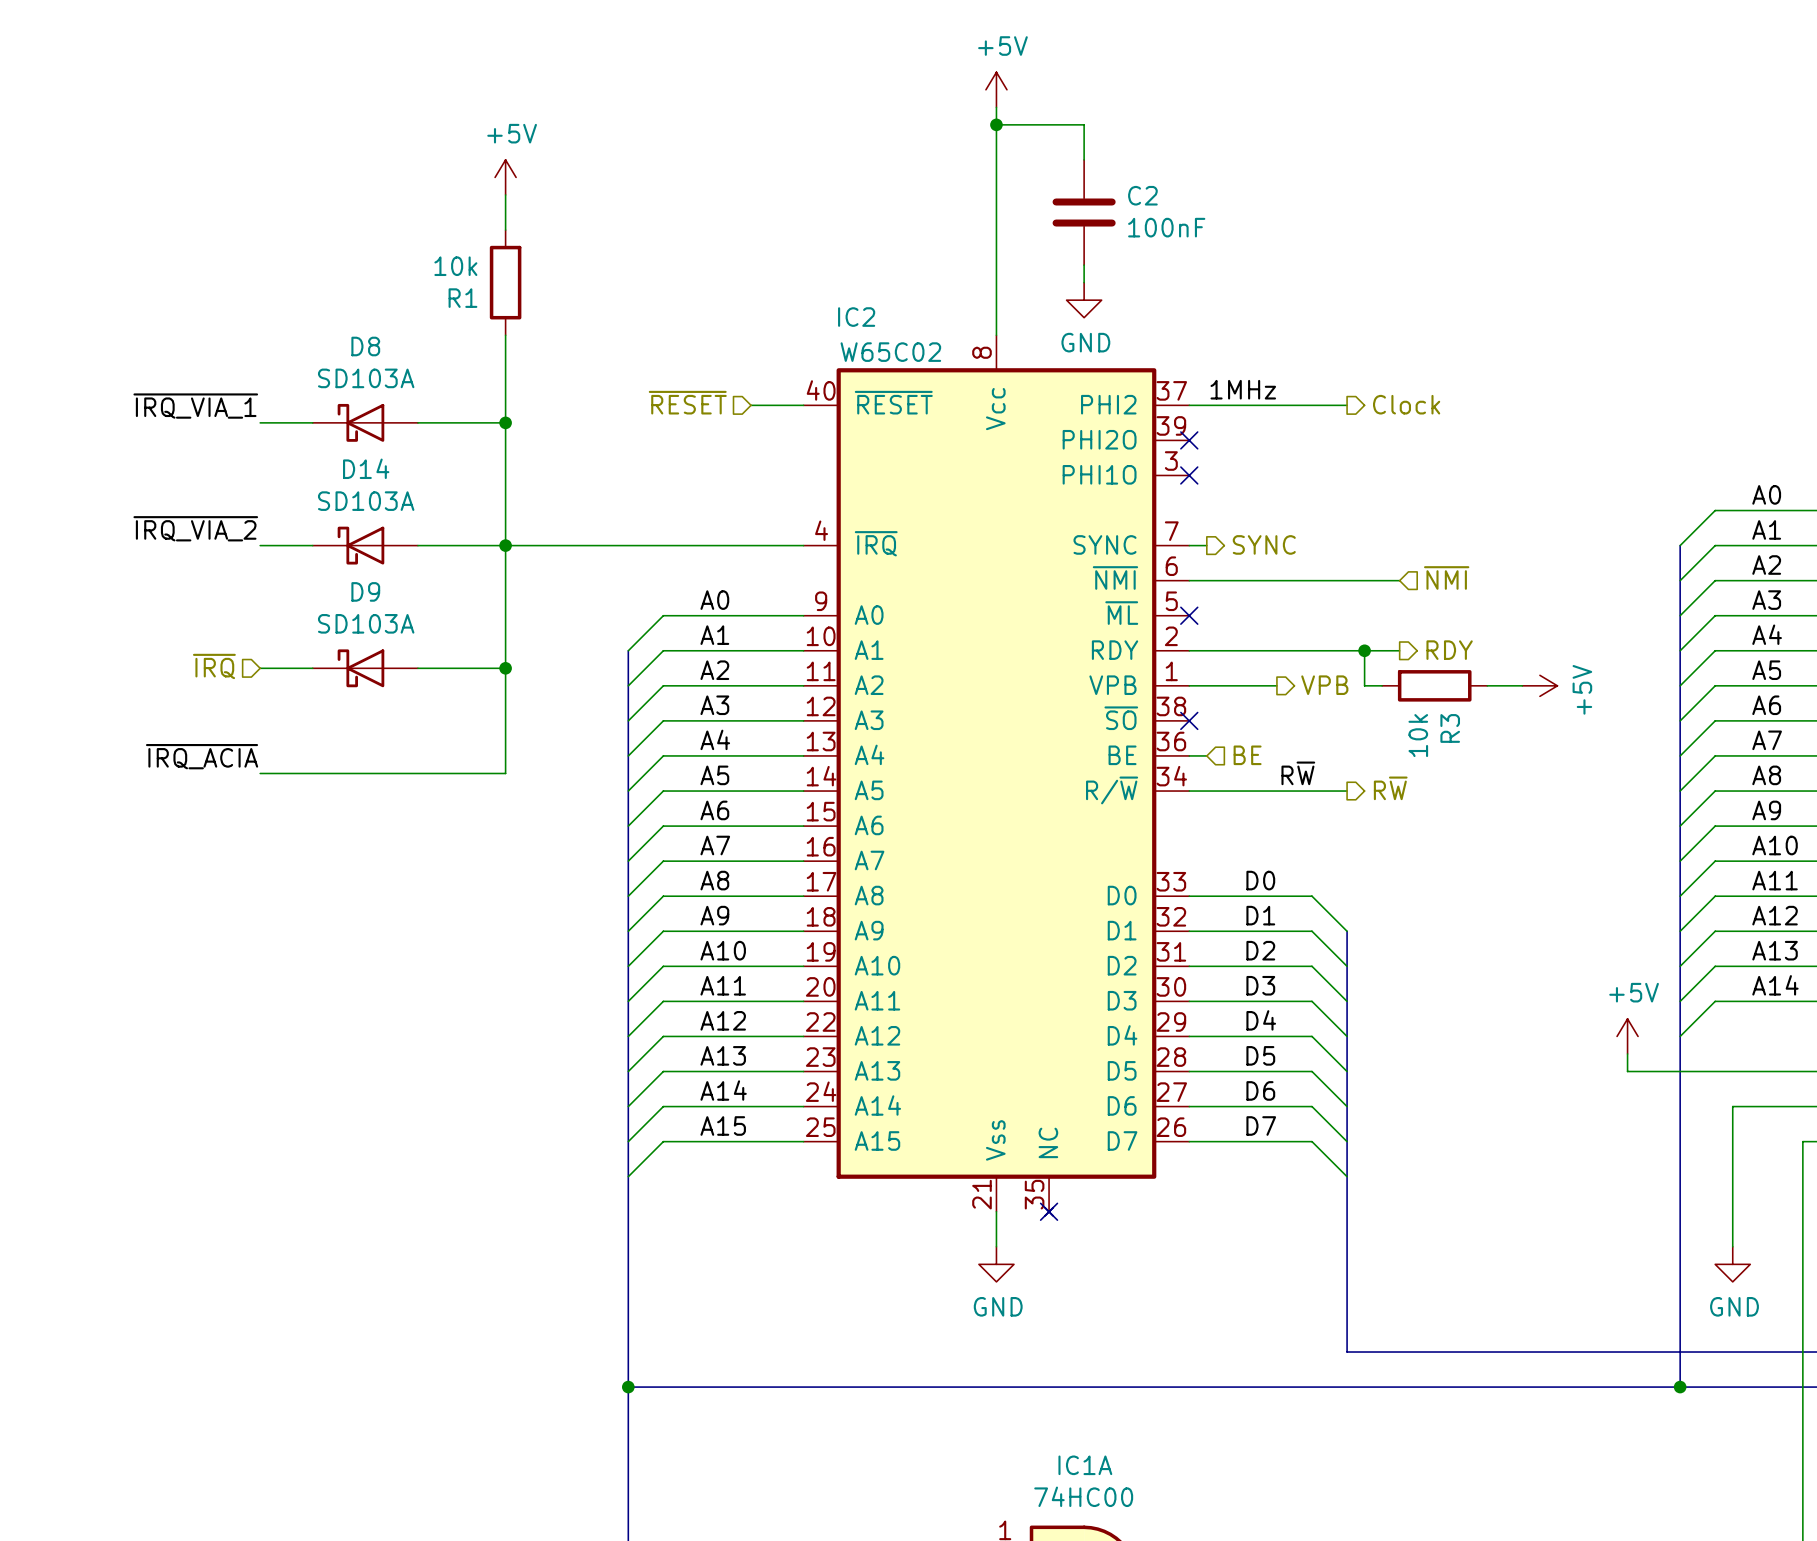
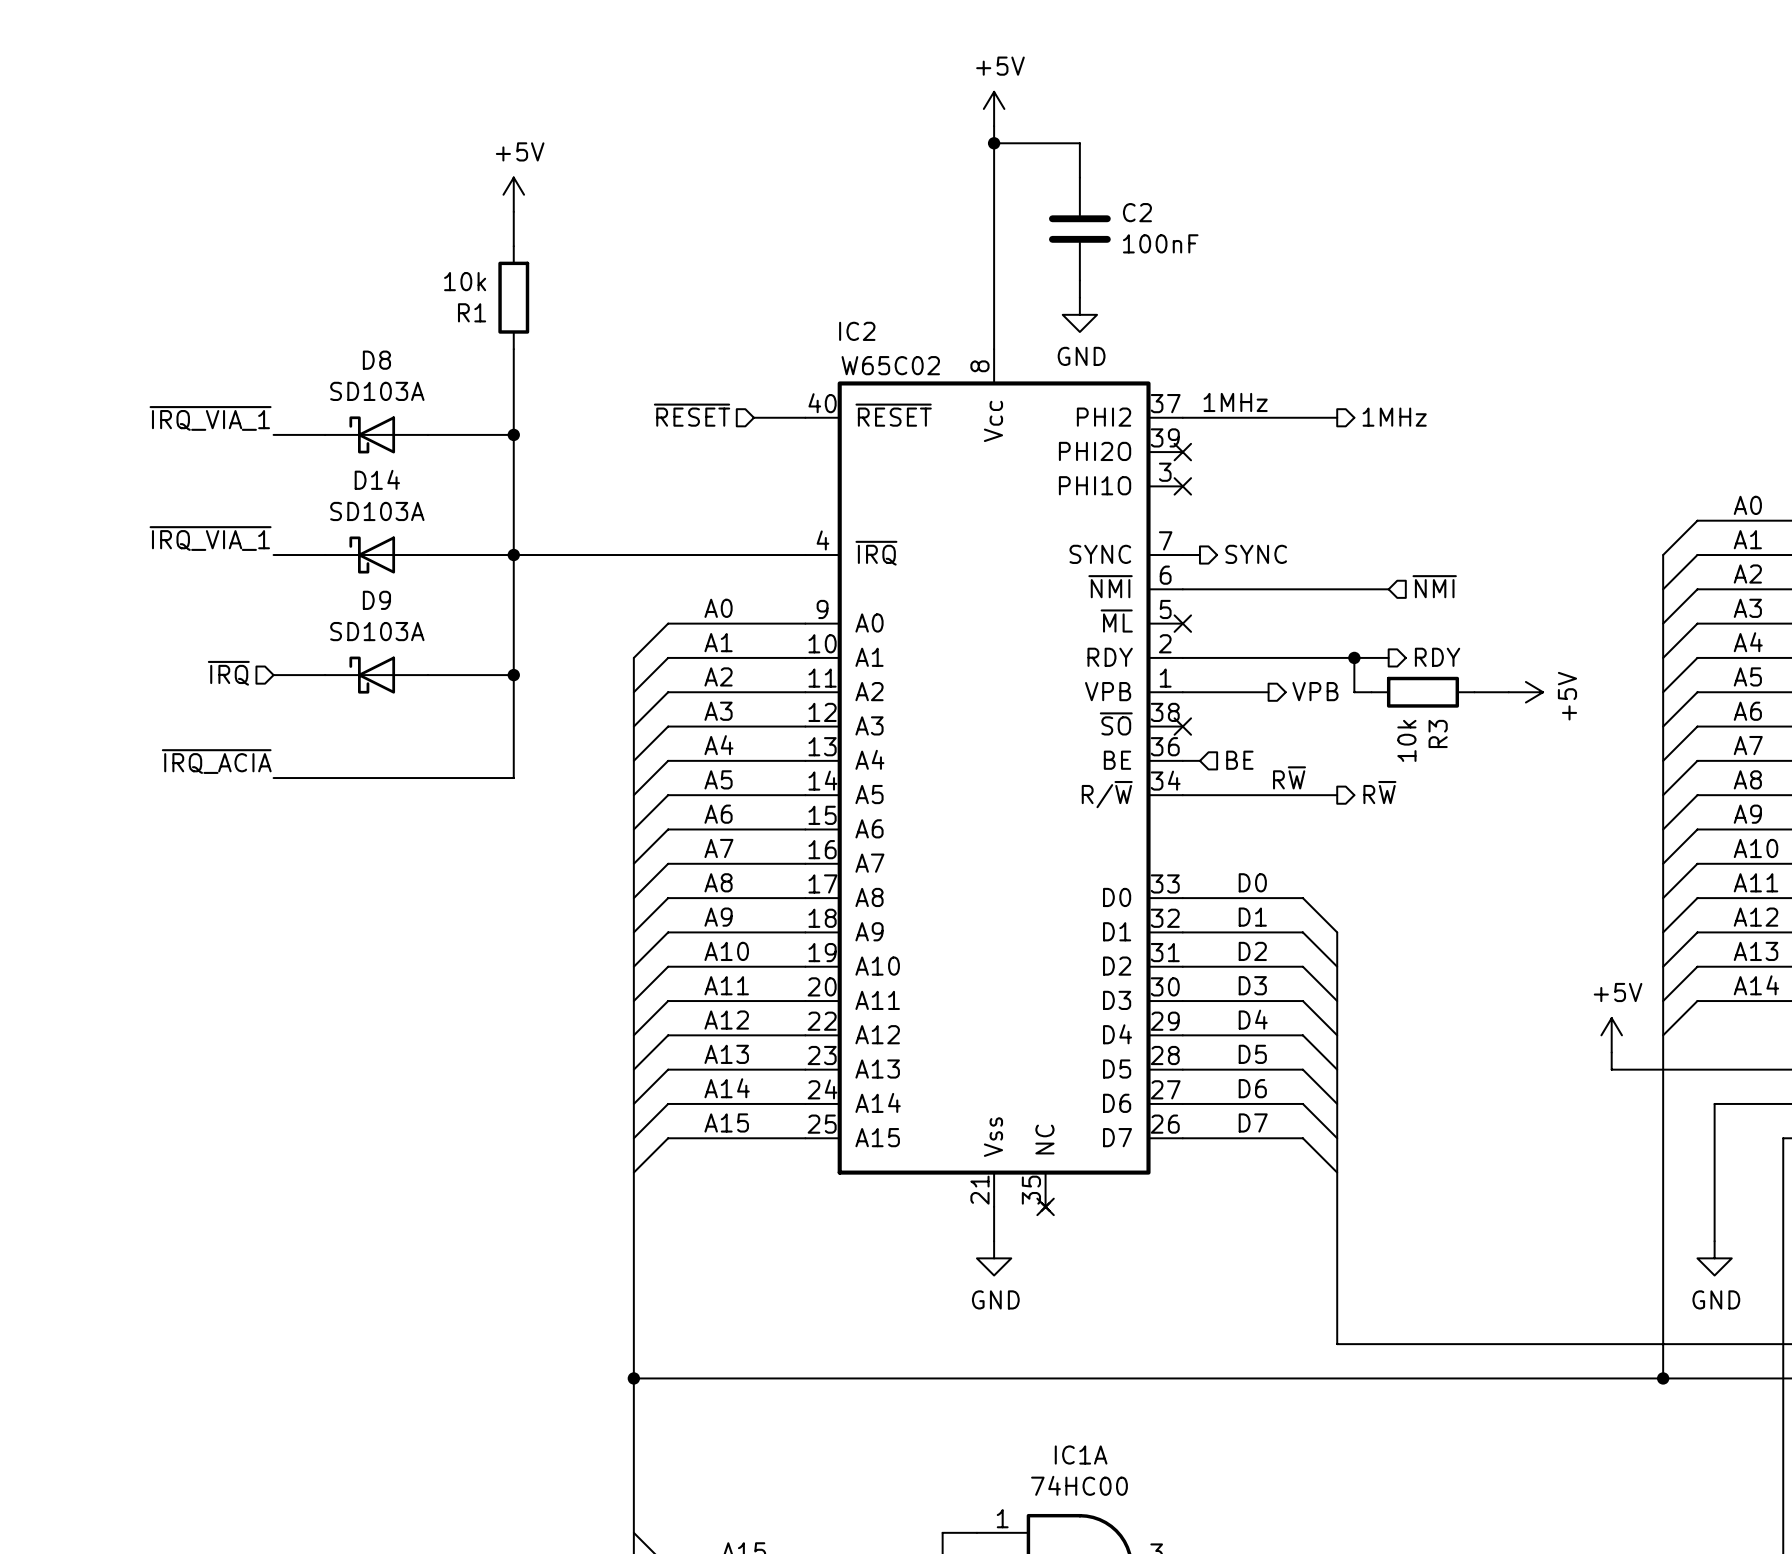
hierarchical label: Clock (1406, 404) -> 1MHz (1394, 417)
label: ~{IRQ_VIA_2} (195, 528) -> ~{IRQ_VIA_1} (210, 538)

